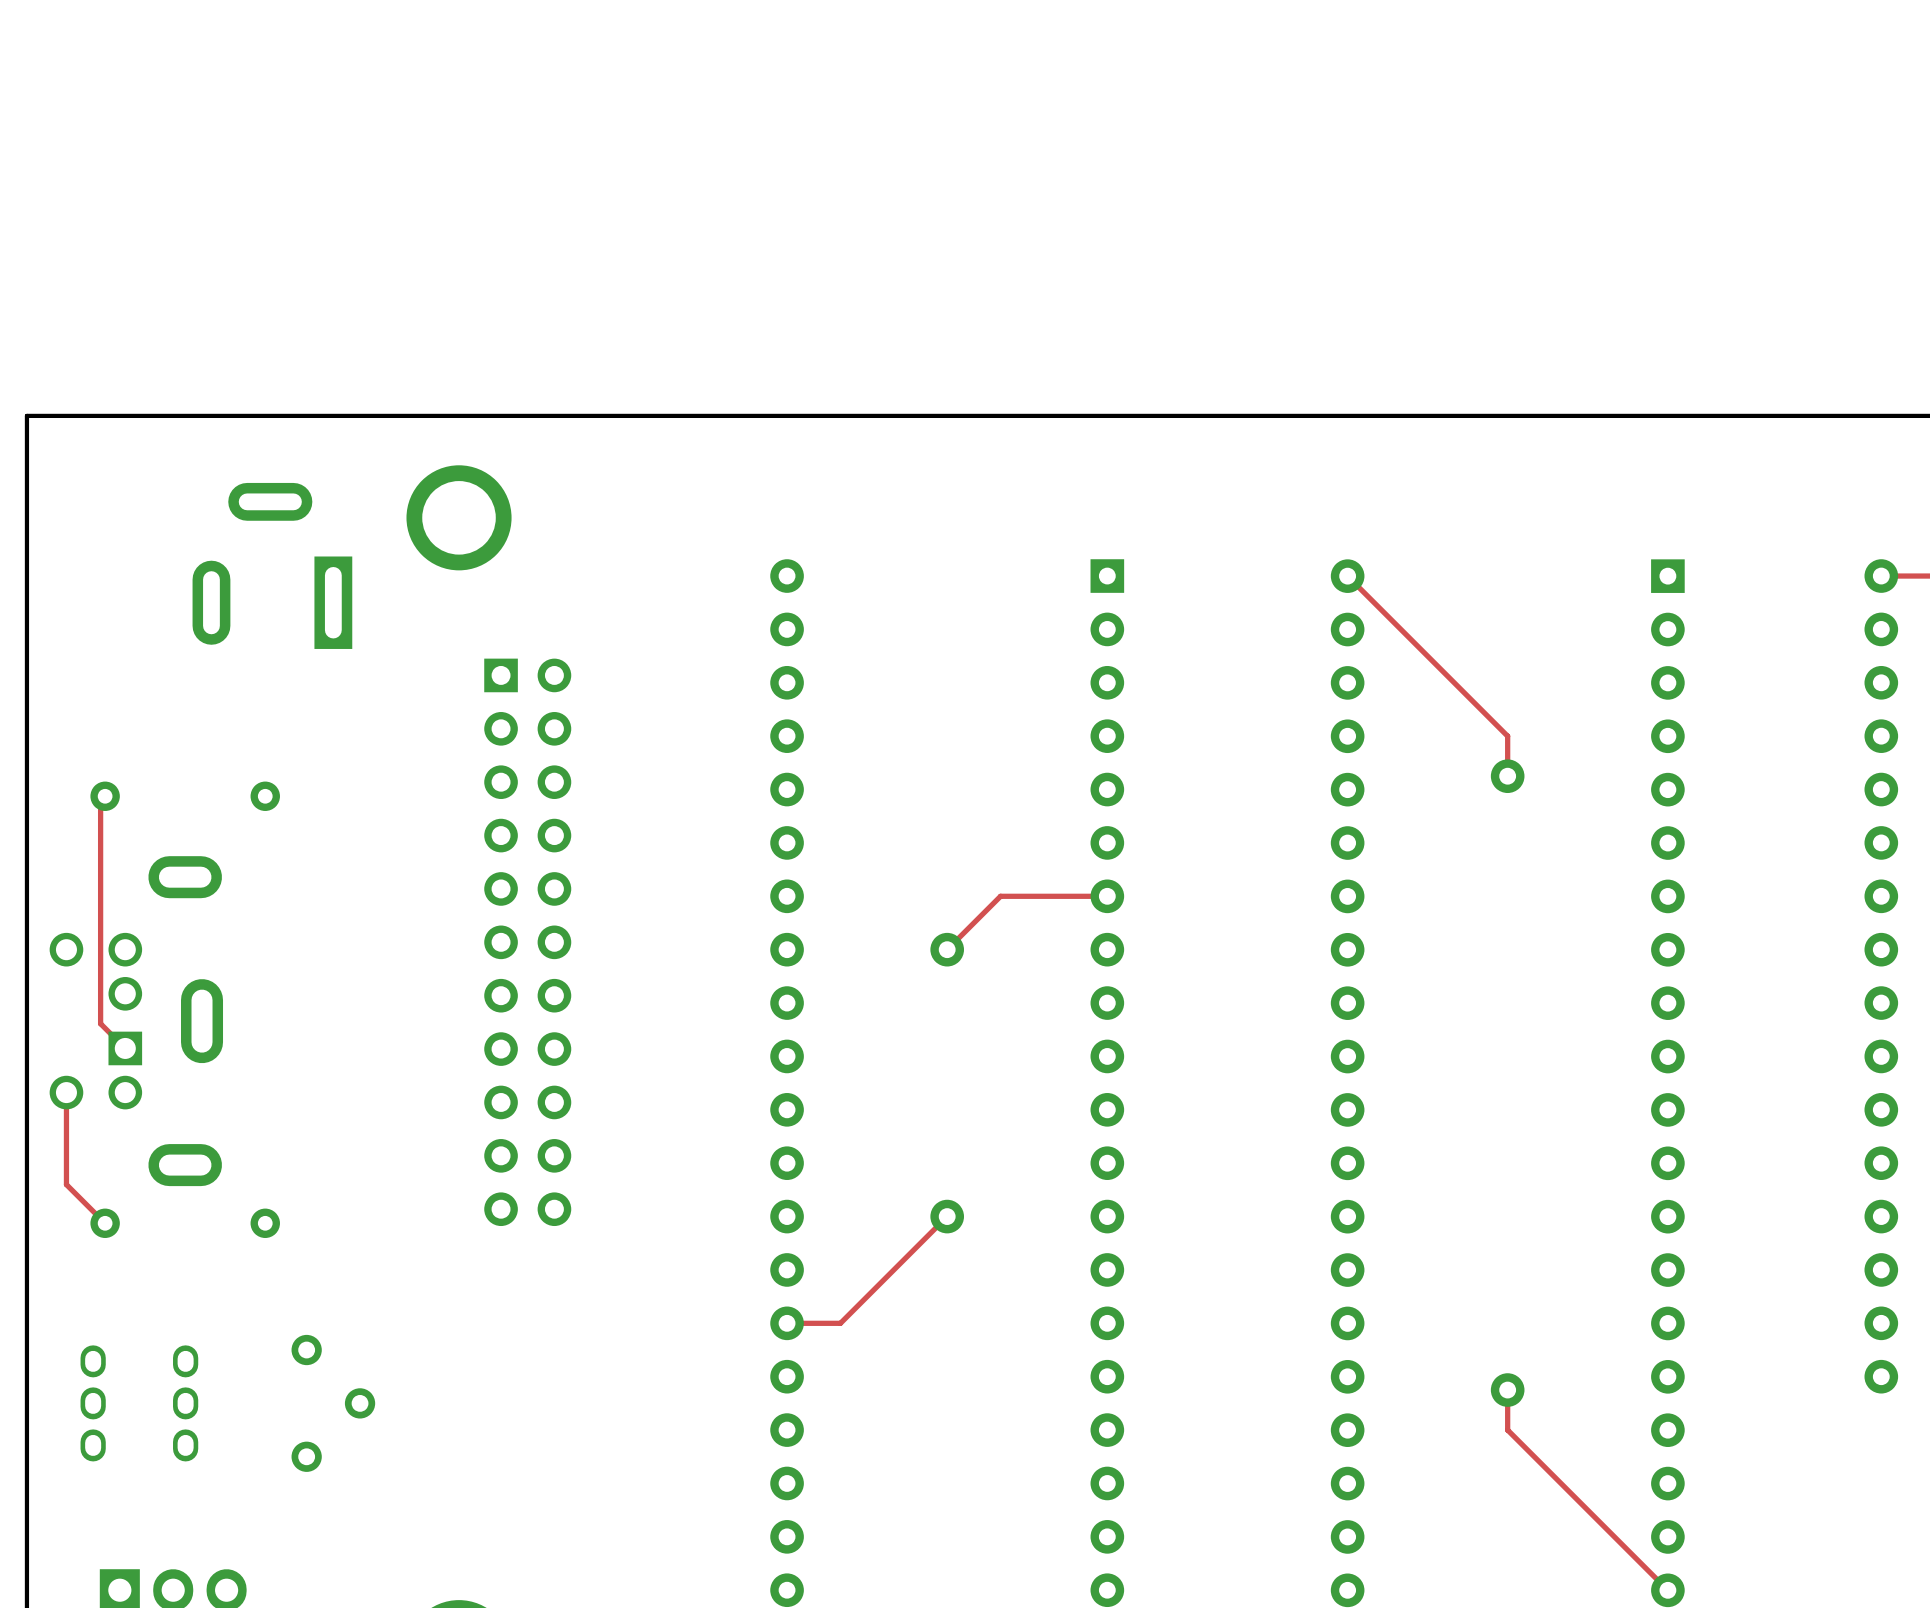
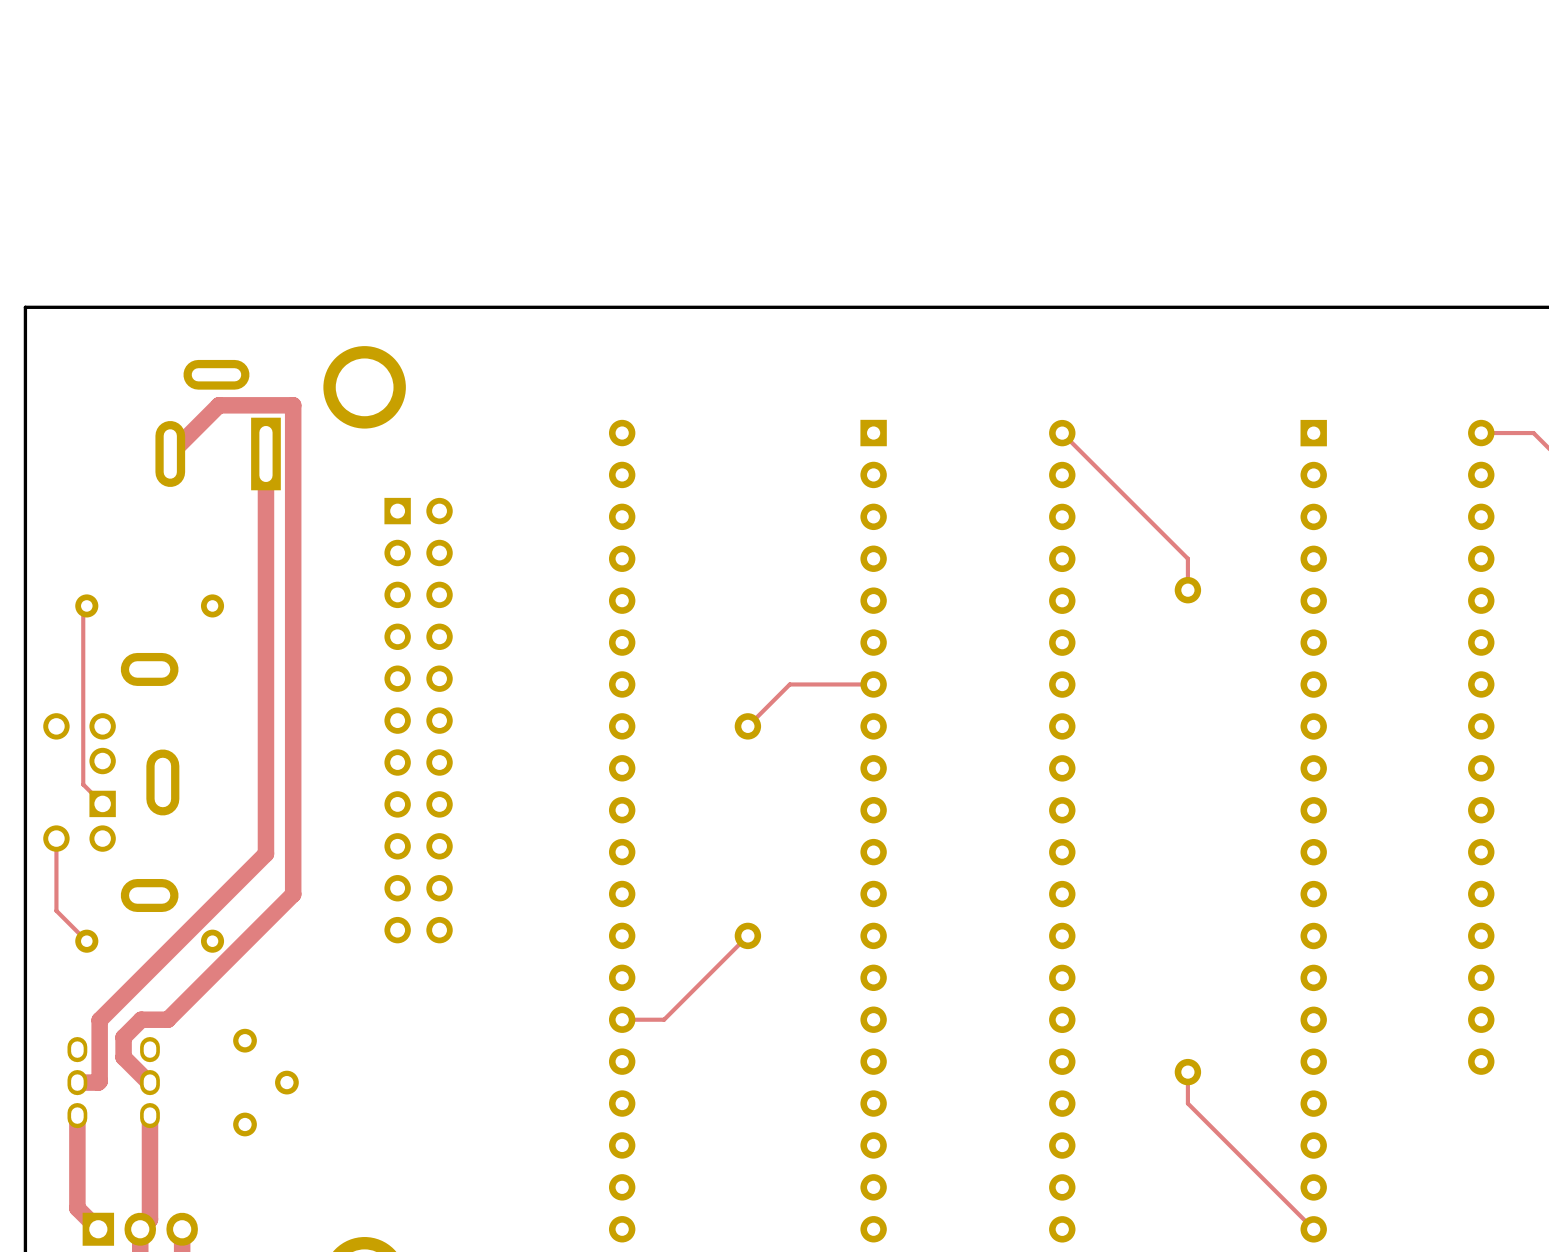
top track: none -> (170, 453) (218, 405) (293, 405) (293, 894) (167, 1019) (141, 1019) (123, 1037) (123, 1057) (149, 1082)
top track: none -> (265, 453) (265, 853) (99, 1020) (99, 1081) (77, 1082)
top track: none -> (77, 1115) (77, 1208) (98, 1229)
top track: none -> (149, 1115) (149, 1219) (140, 1229)

